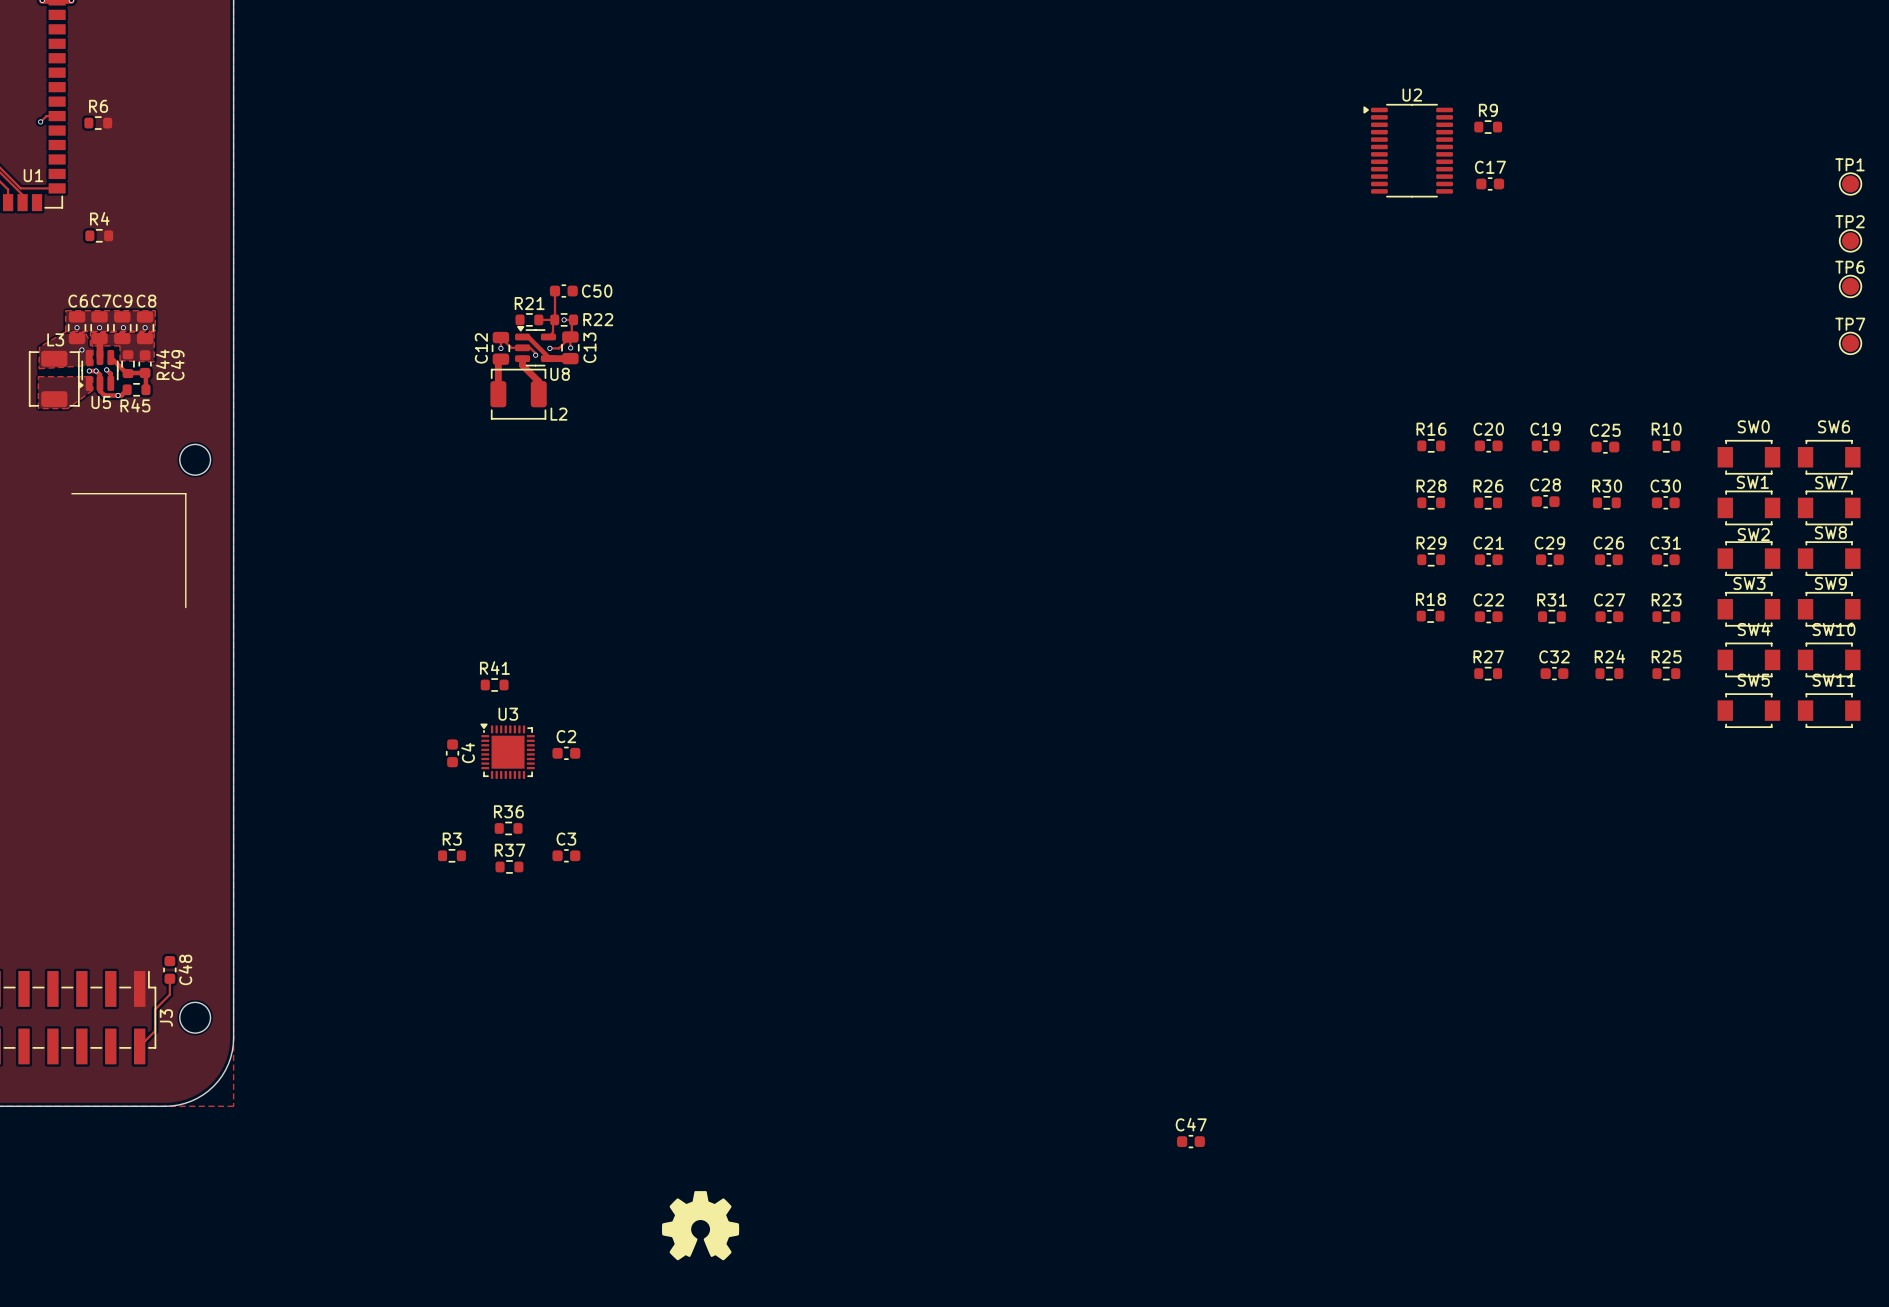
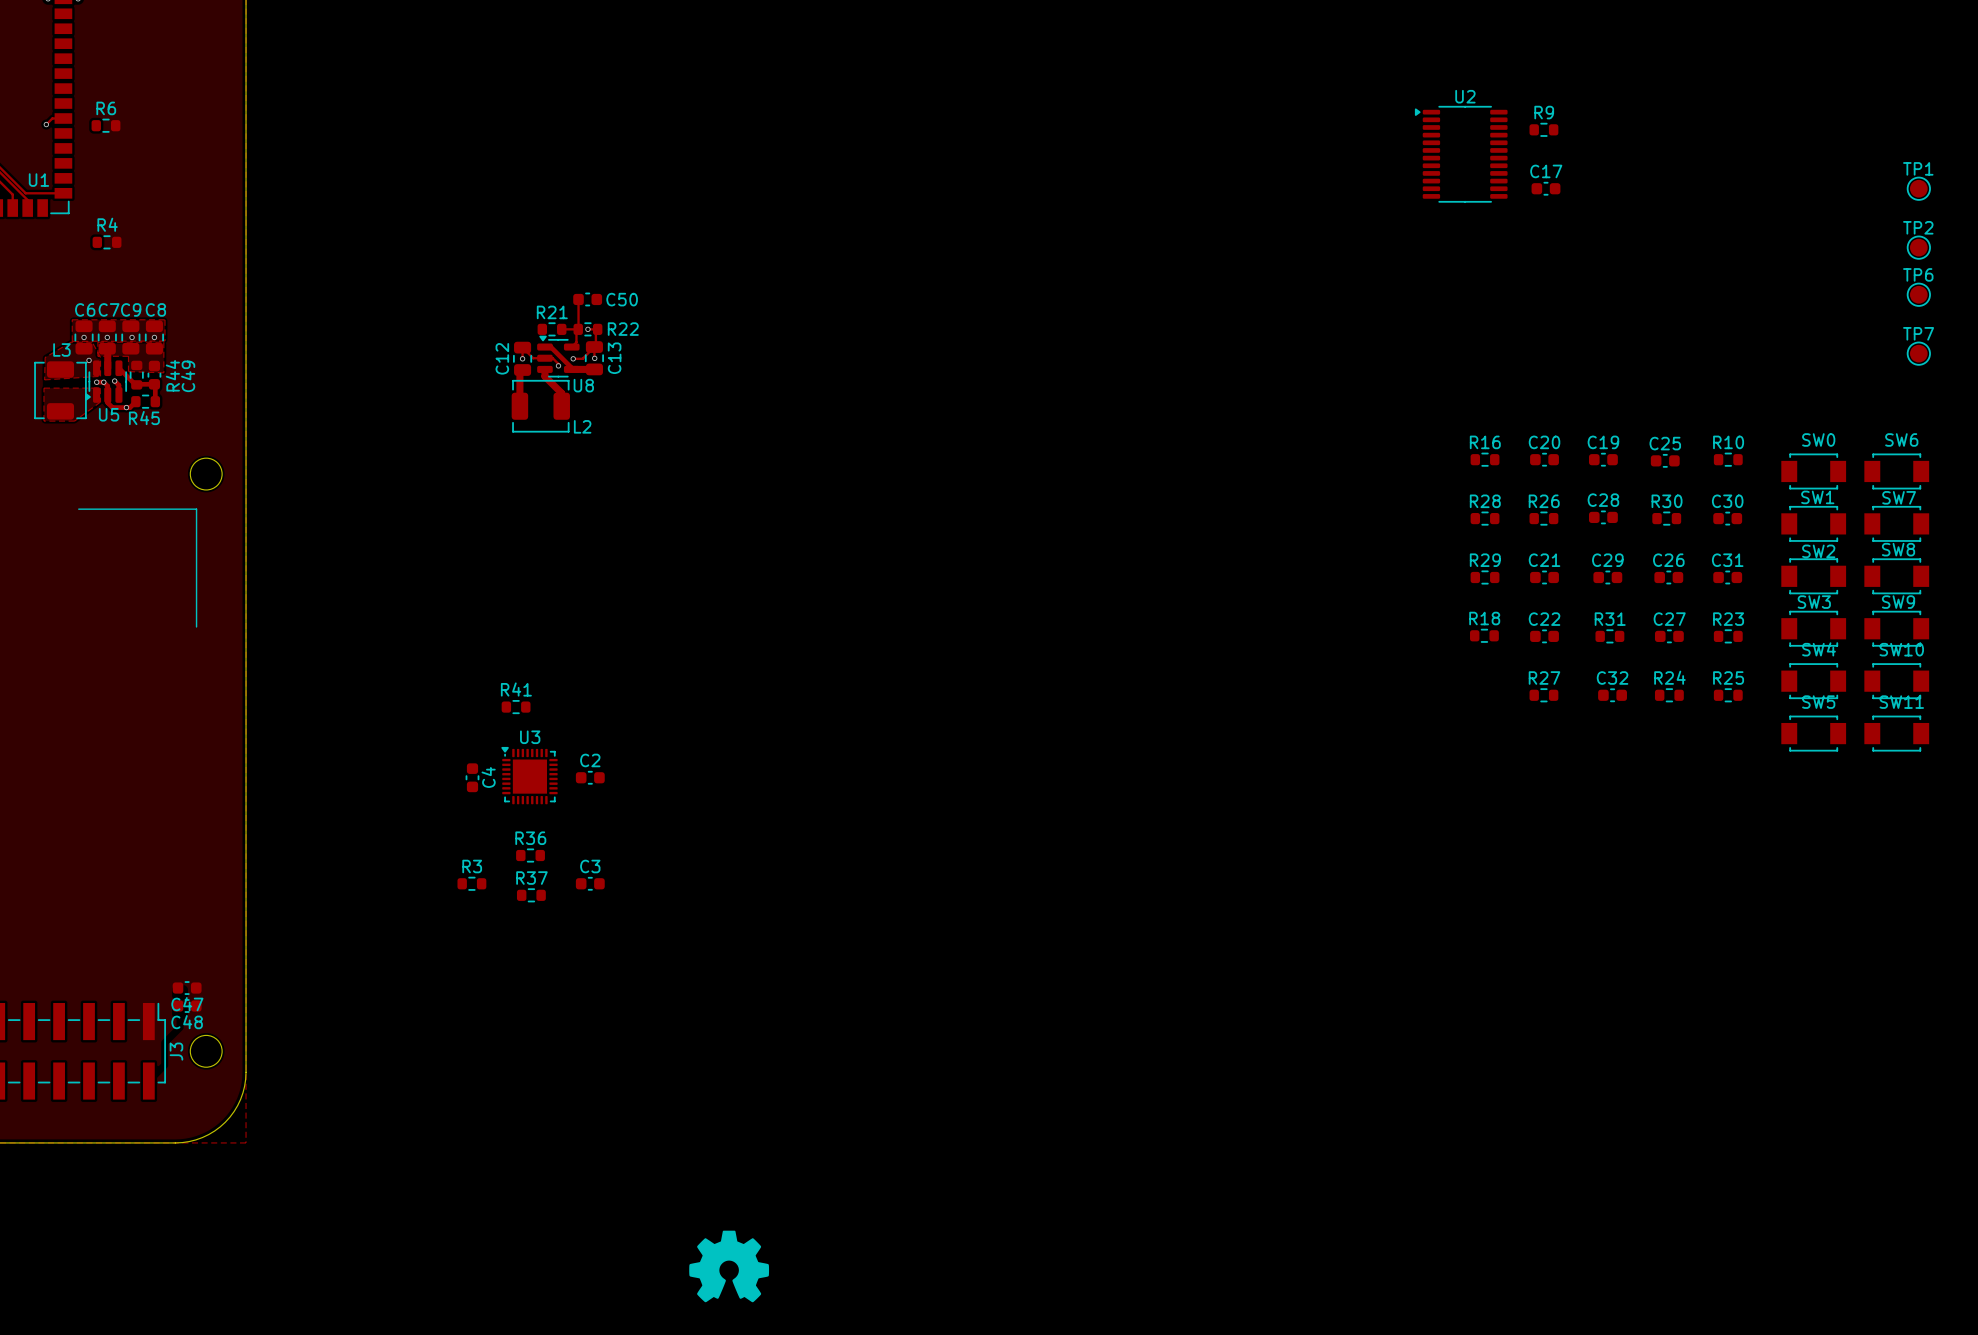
C48 rotation: 0° (169, 969) -> 90° clockwise (187, 1006)
track: (169, 978) (169, 994) (155, 1009) (155, 1031) (139, 1046) -> none
C47 name position: C47 (1191, 1124) -> C47 (187, 1004)
C47 position: (1190, 1141) -> (187, 988)

